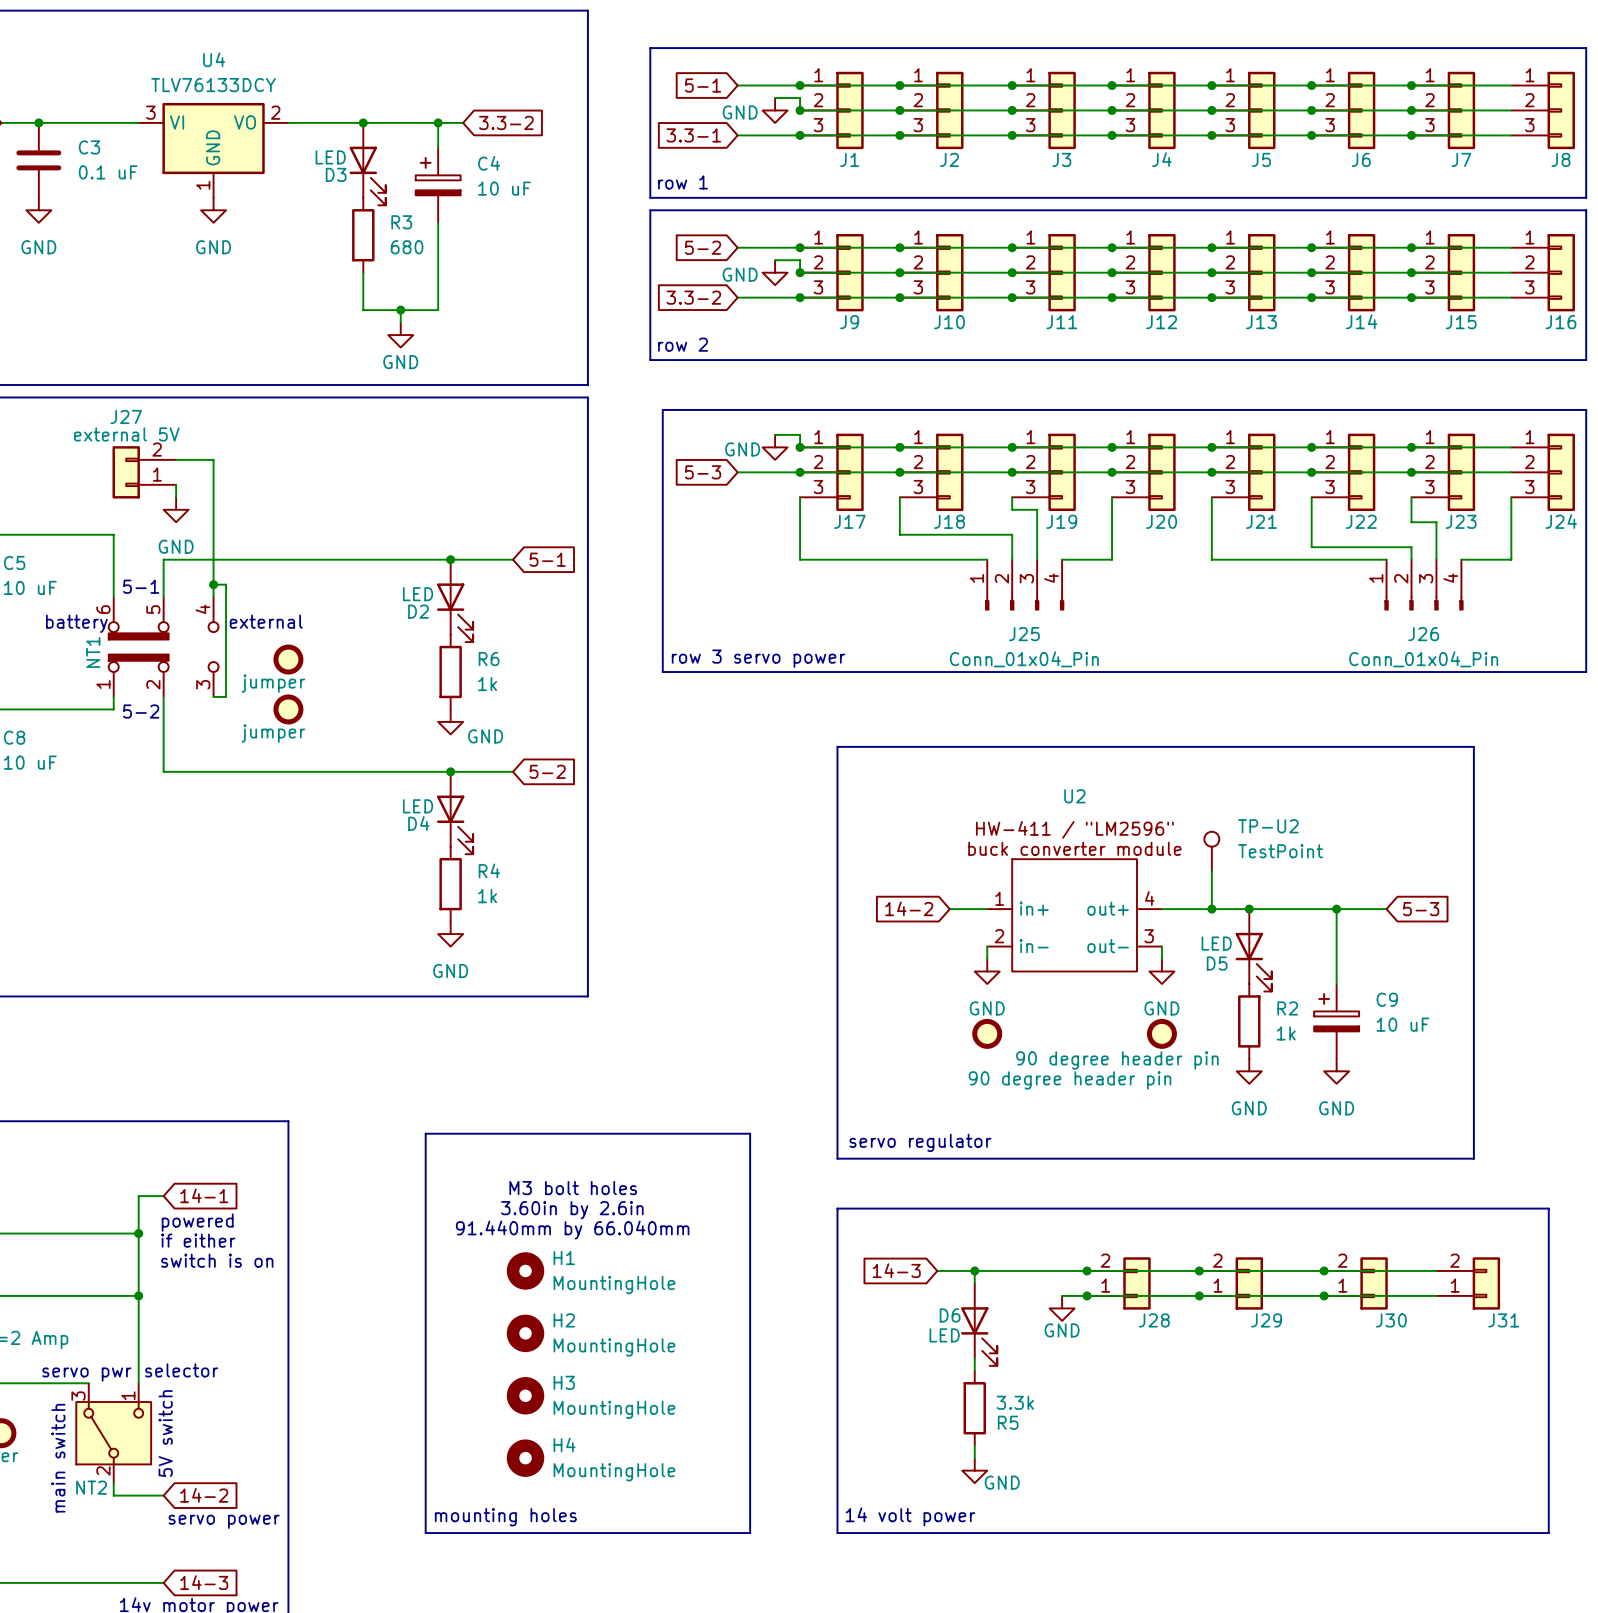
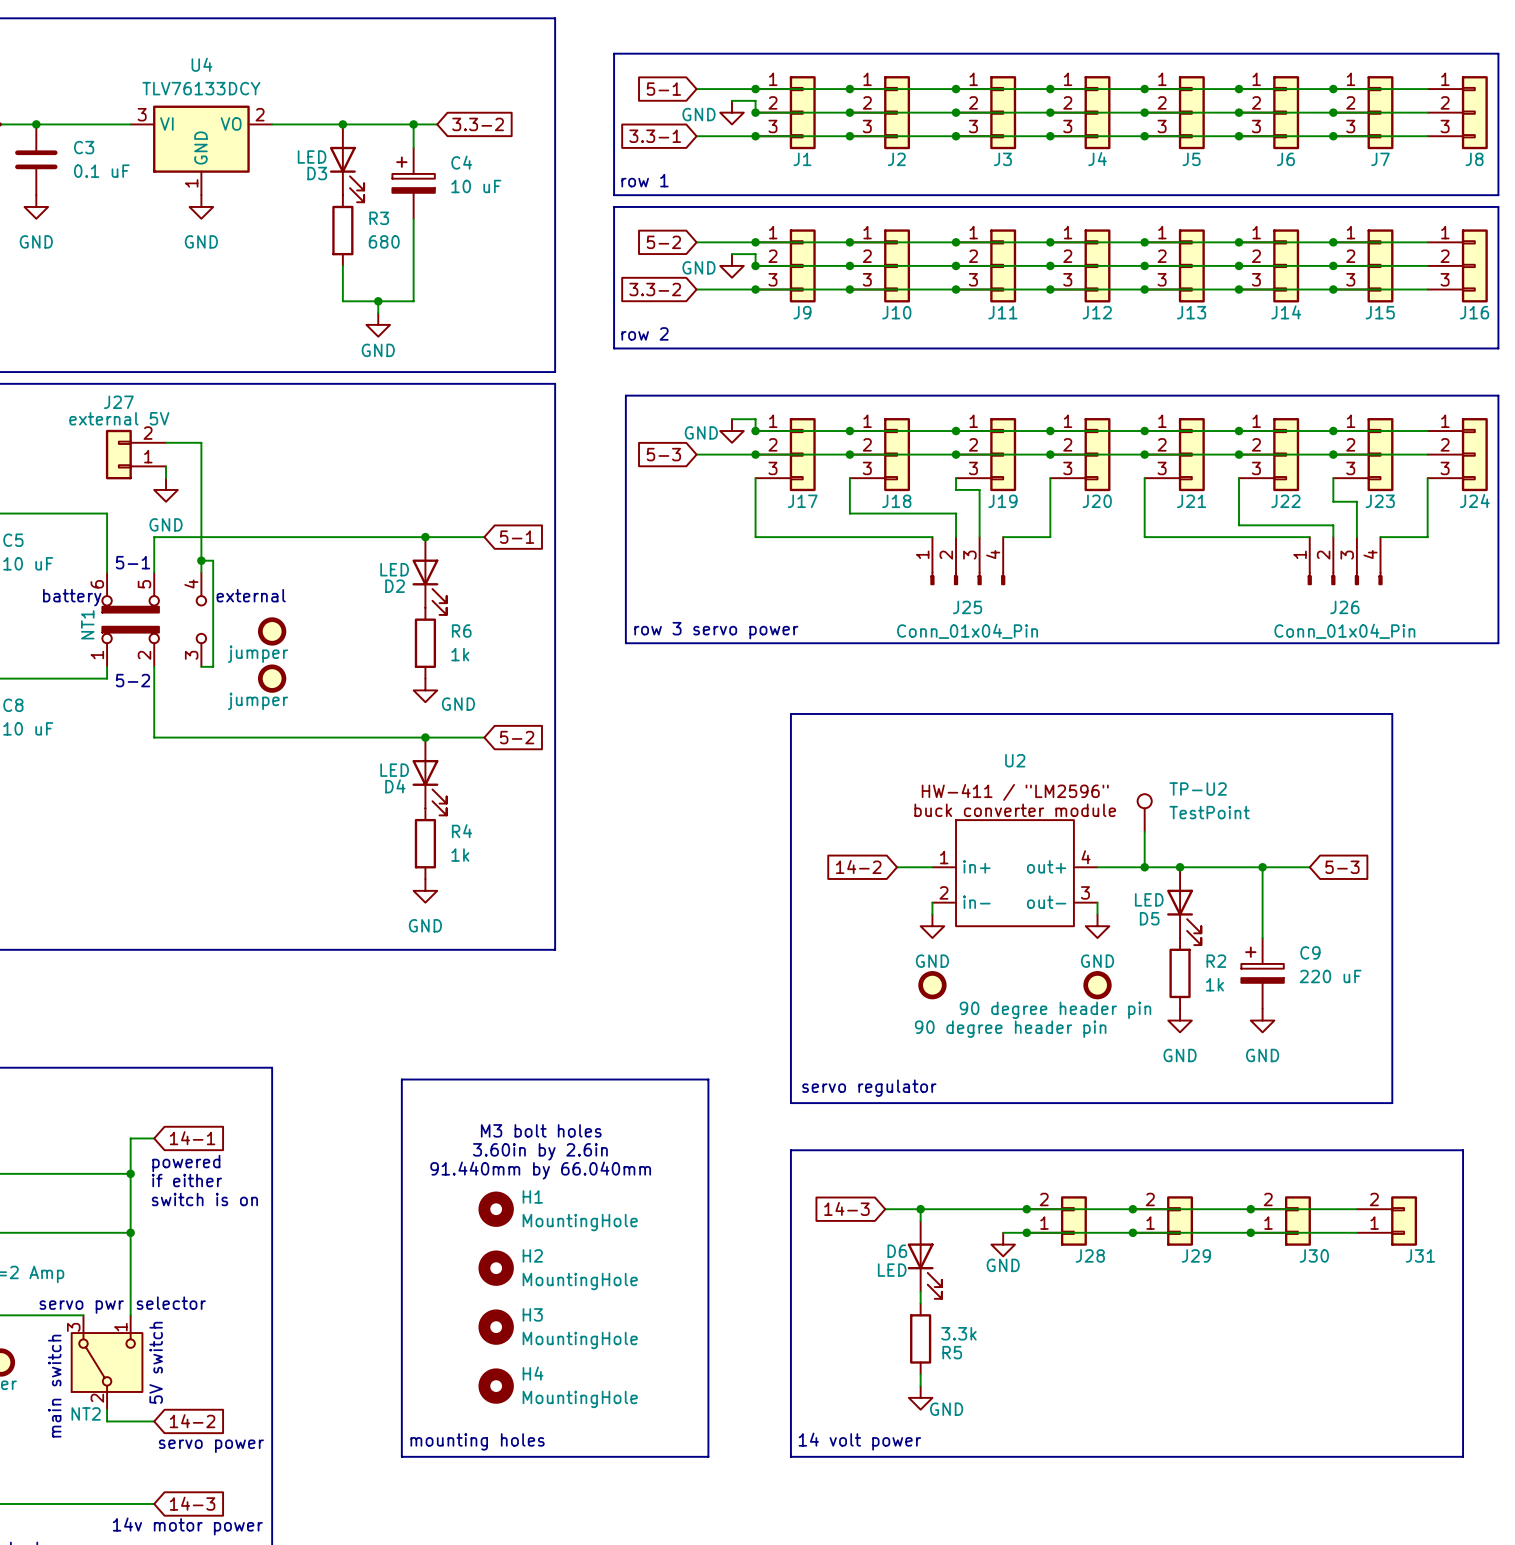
C9 value: 10 uF (1402, 1024) -> 220 uF (1330, 976)

